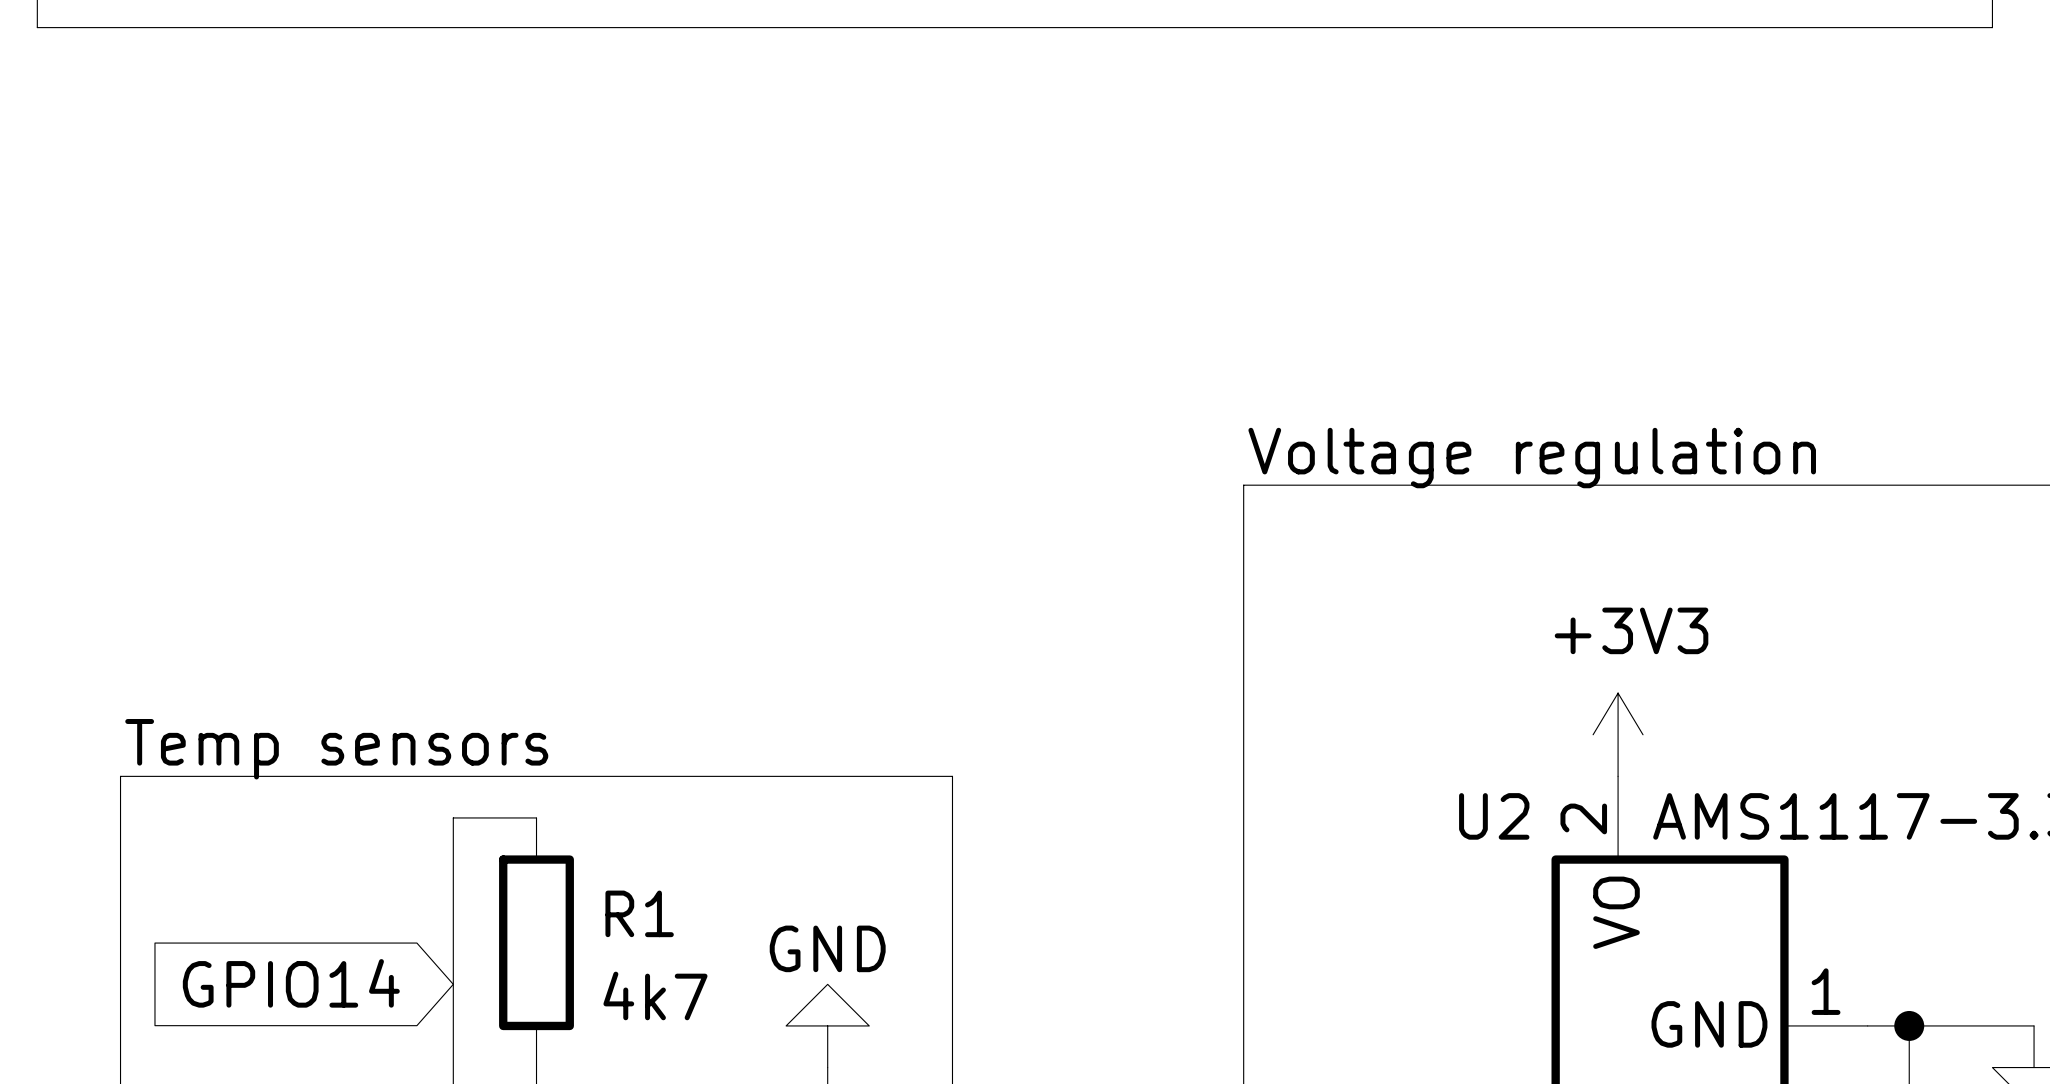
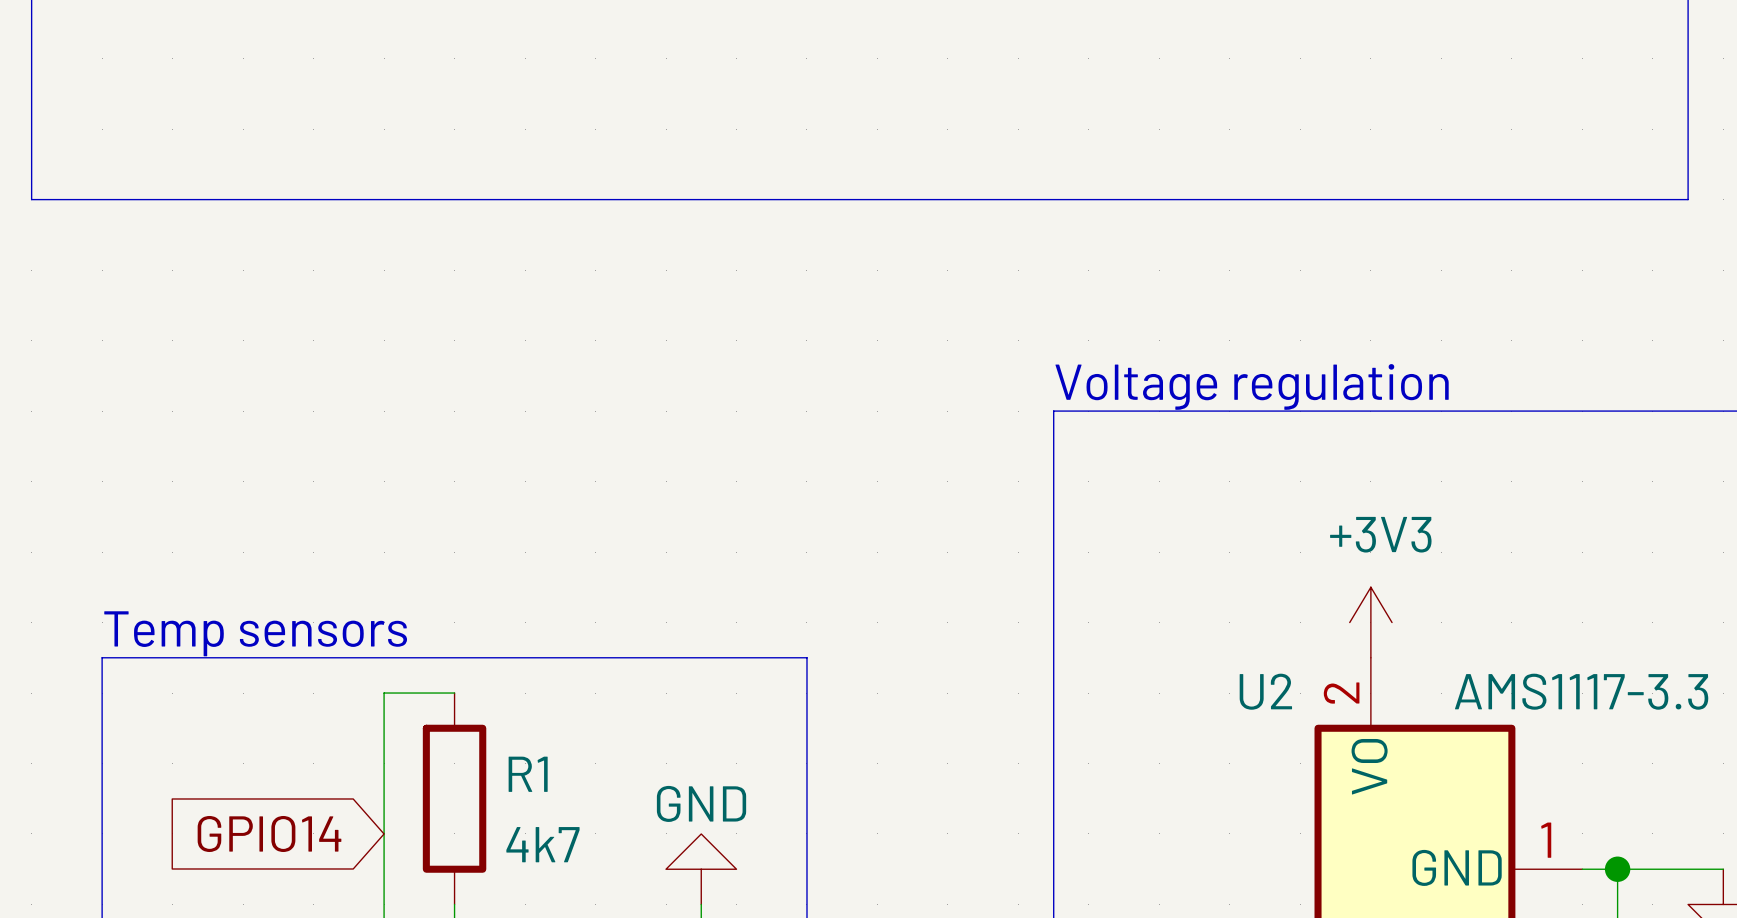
line: (37, 27) (1992, 27) -> (31, 23) (31, 199) (1688, 199) (1688, 23)

